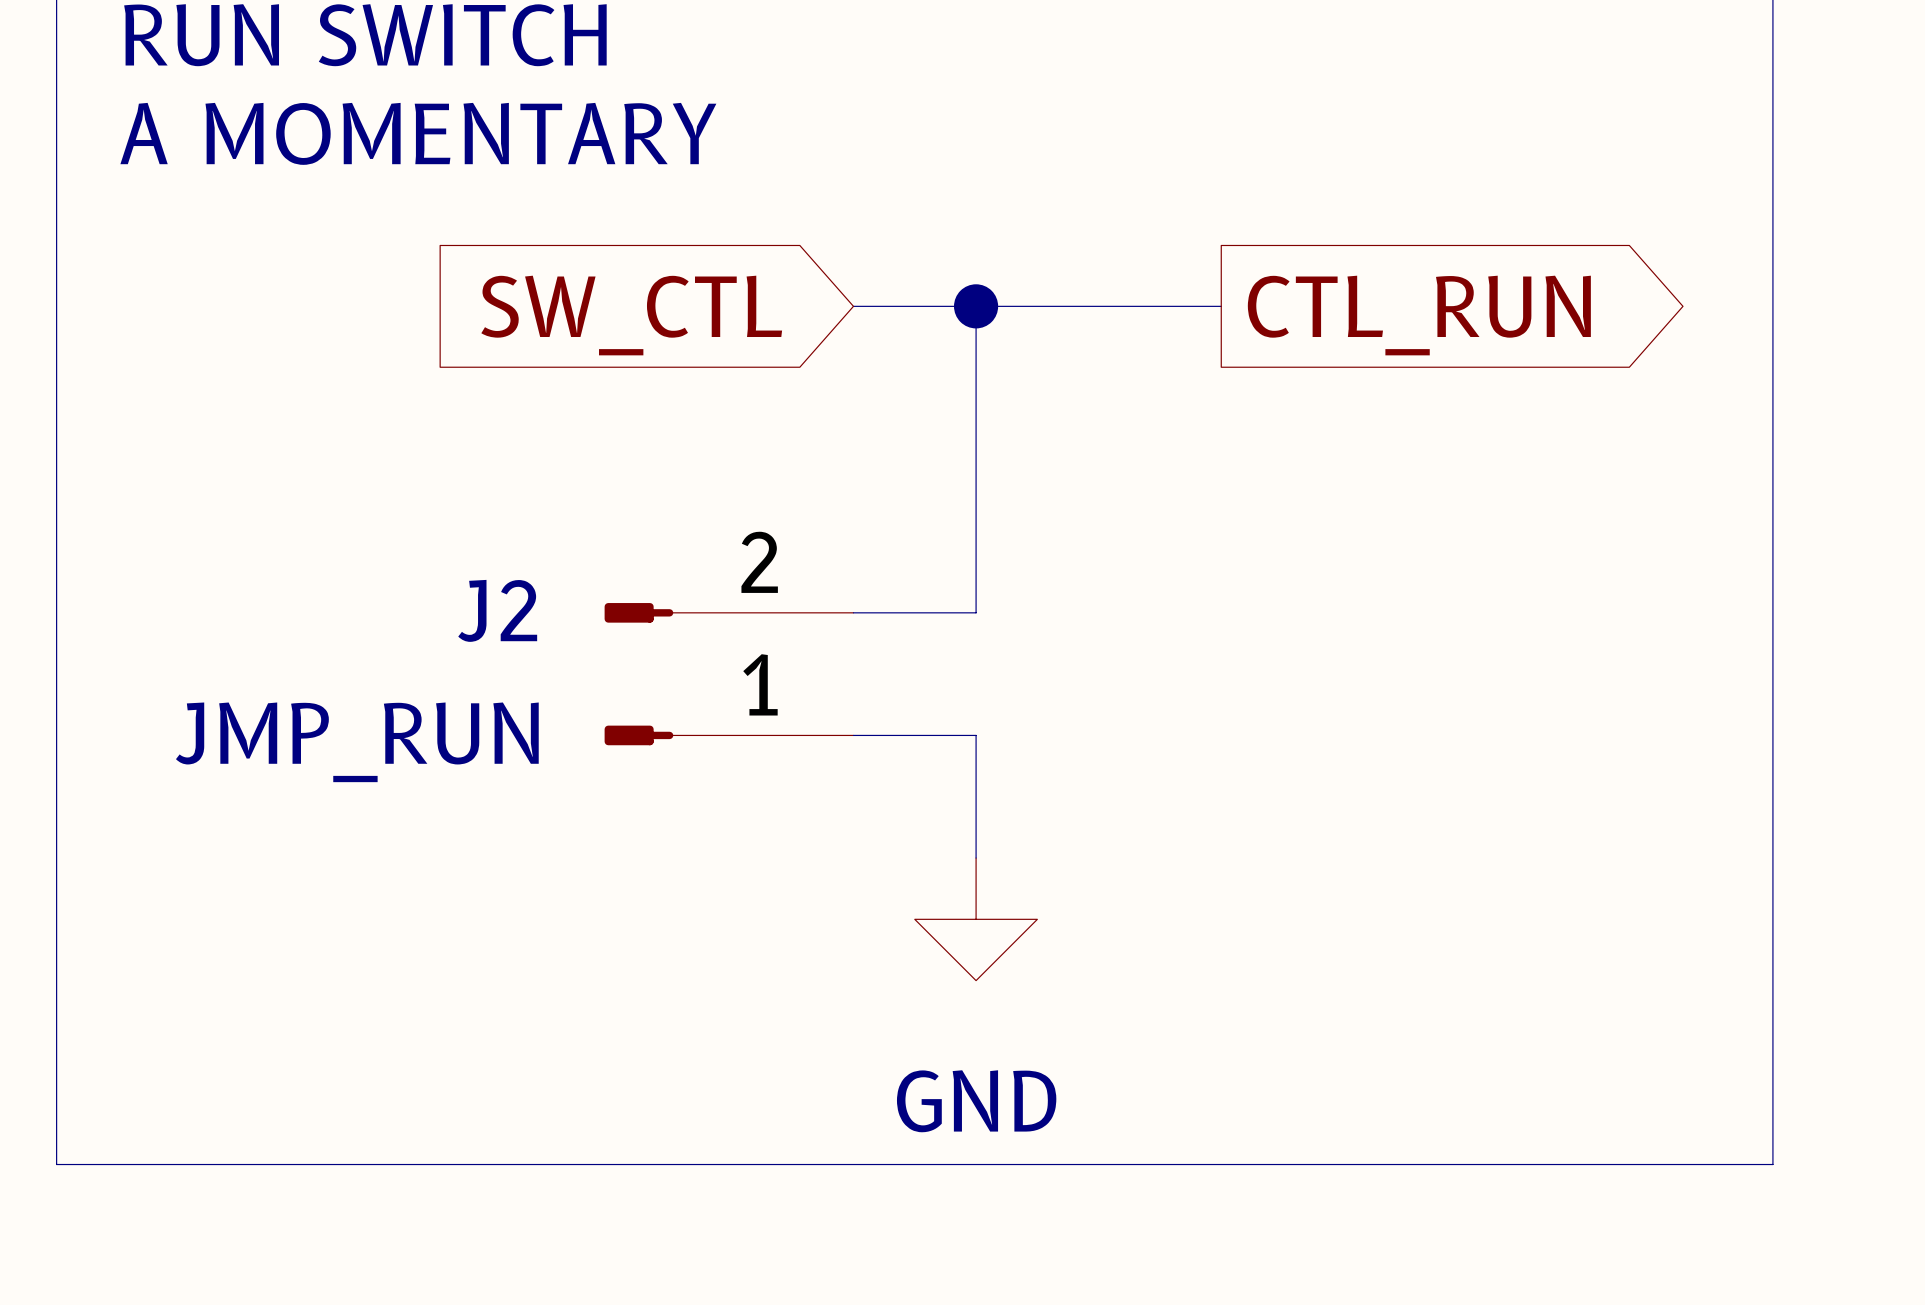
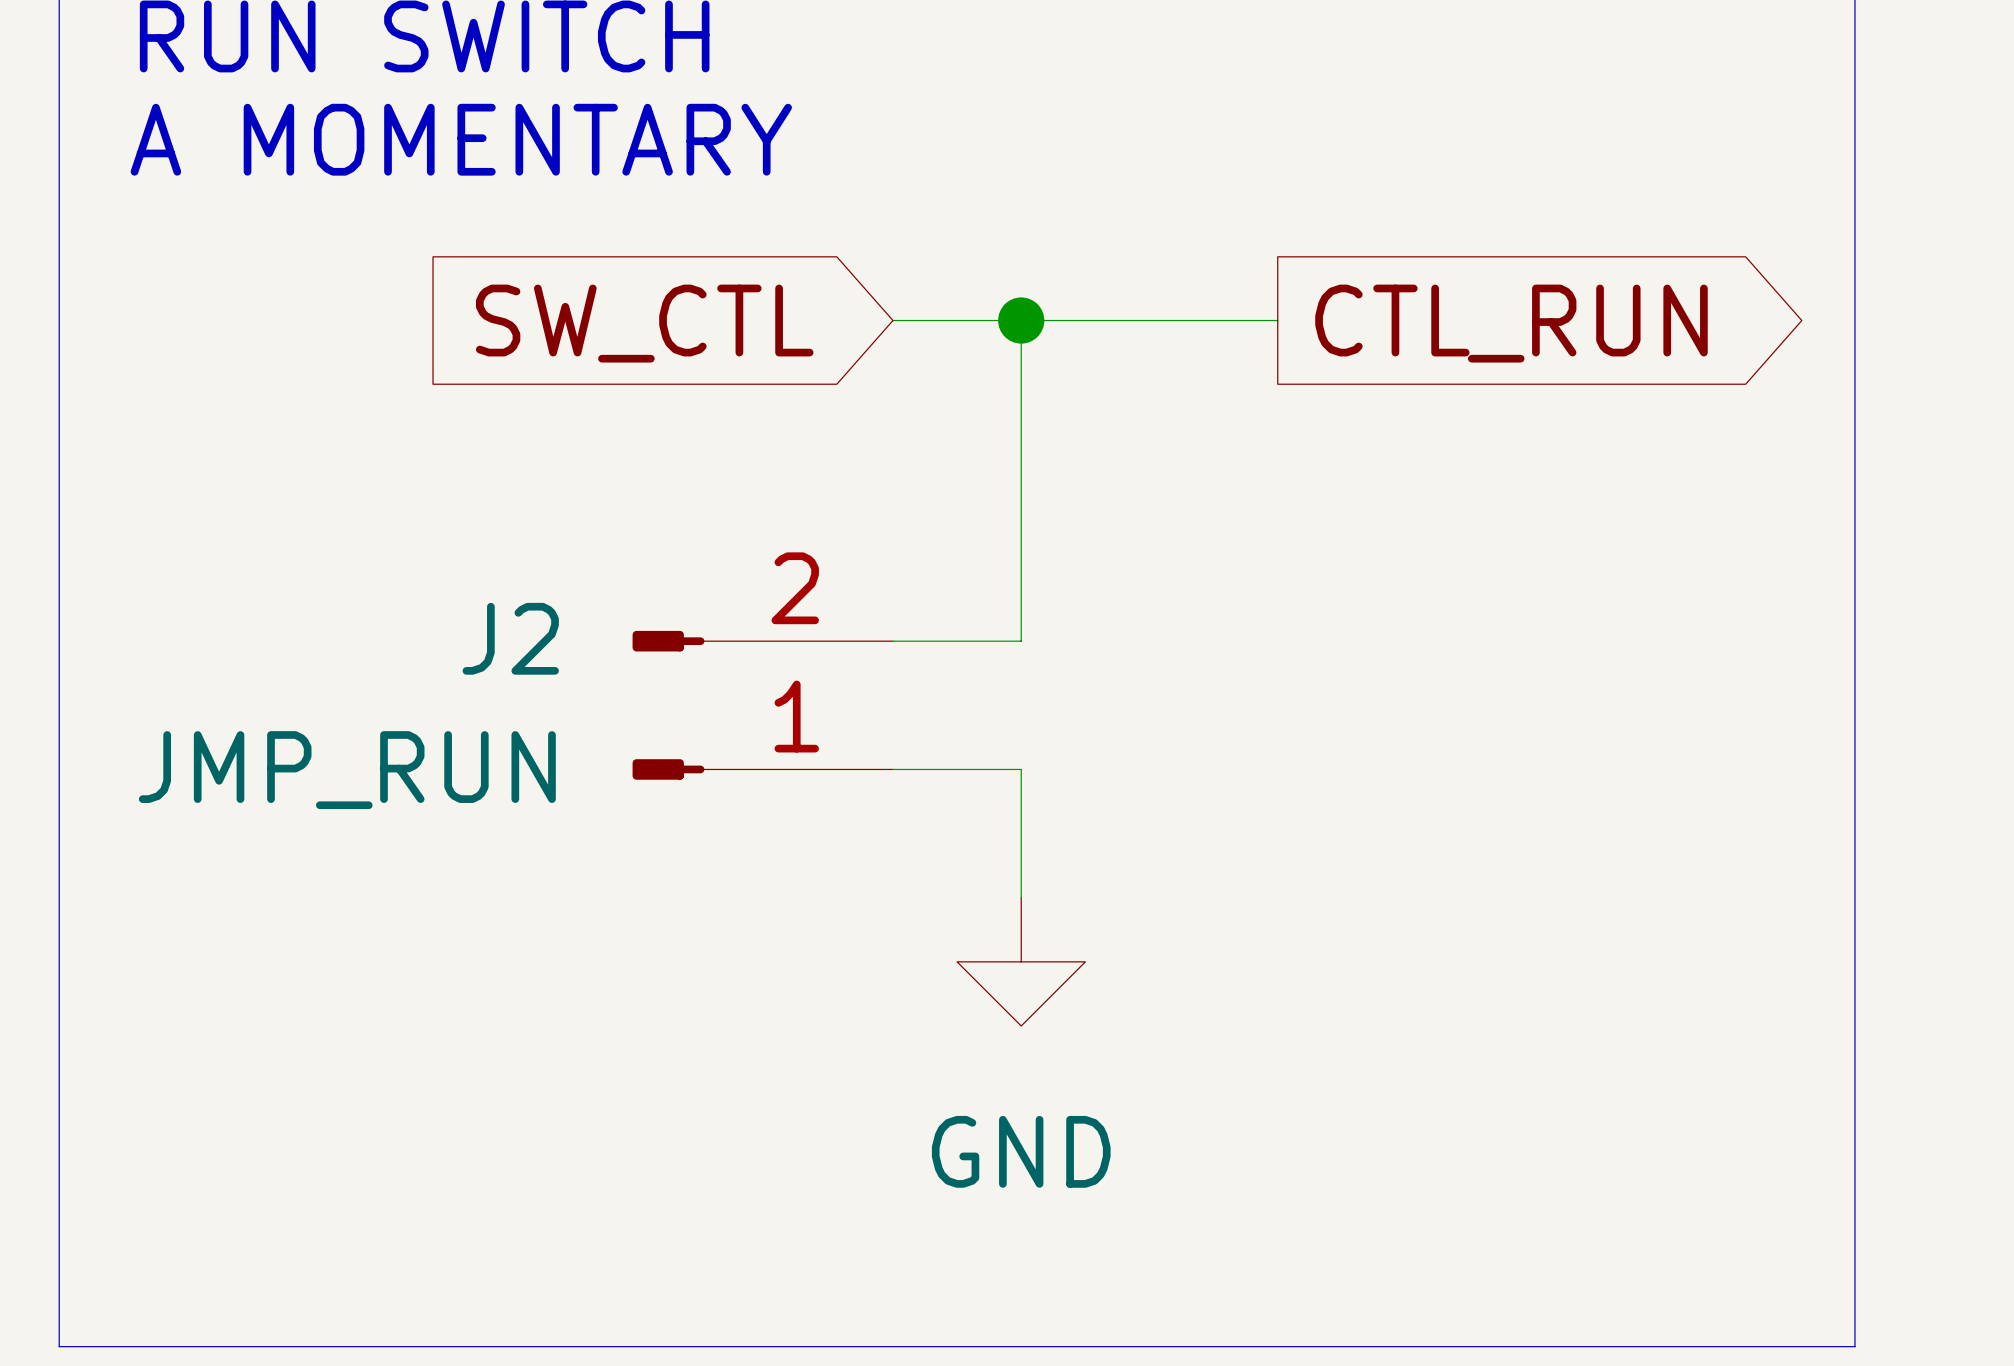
line: (56, 1164) (1772, 1164) -> (59, 1218) (59, 1346) (1854, 1346) (1854, 1218)

